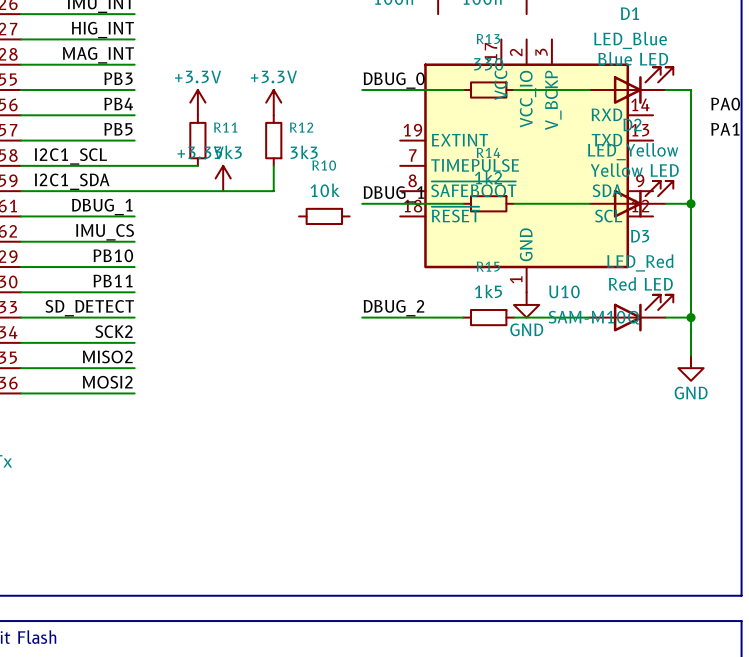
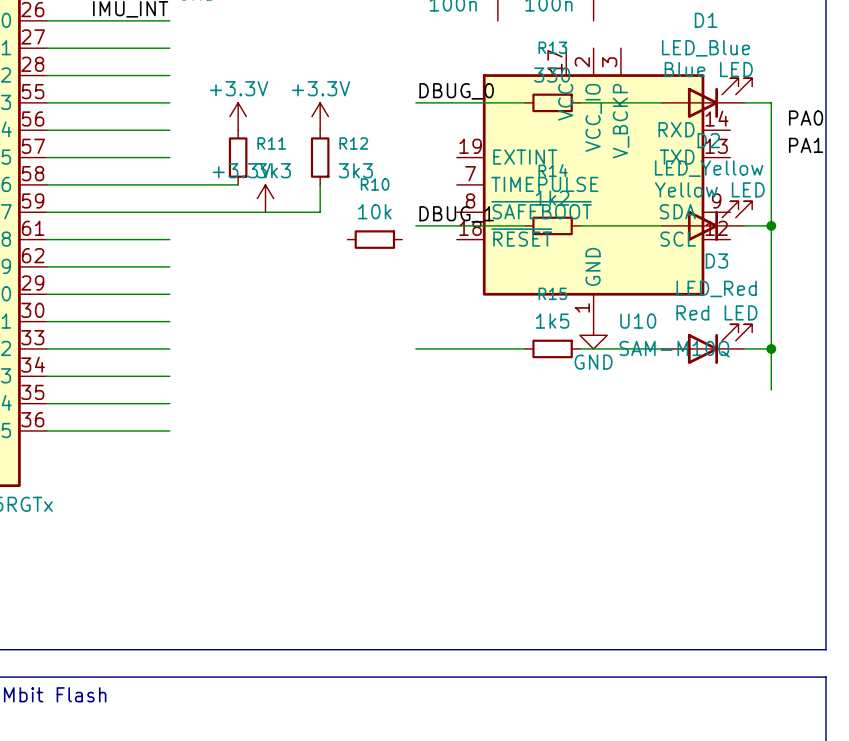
label: HIG_INT (102, 30) -> none
label: MAG_INT (98, 55) -> none
label: PB3 (118, 78) -> none
label: PB4 (118, 104) -> none
label: PB5 (118, 129) -> none
label: I2C1_SCL (70, 156) -> none
label: I2C1_SDA (72, 181) -> none
label: DBUG_1 (102, 207) -> none
label: IMU_CS (105, 232) -> none
label: PB10 (113, 255) -> none
label: PB11 (113, 281) -> none
label: SD_DETECT (89, 308) -> none
label: DBUG_2 (393, 308) -> none
label: SCK2 (114, 331) -> none
label: MISO2 (107, 356) -> none
power symbol: GND (691, 368) -> none
label: MOSI2 (107, 382) -> none

